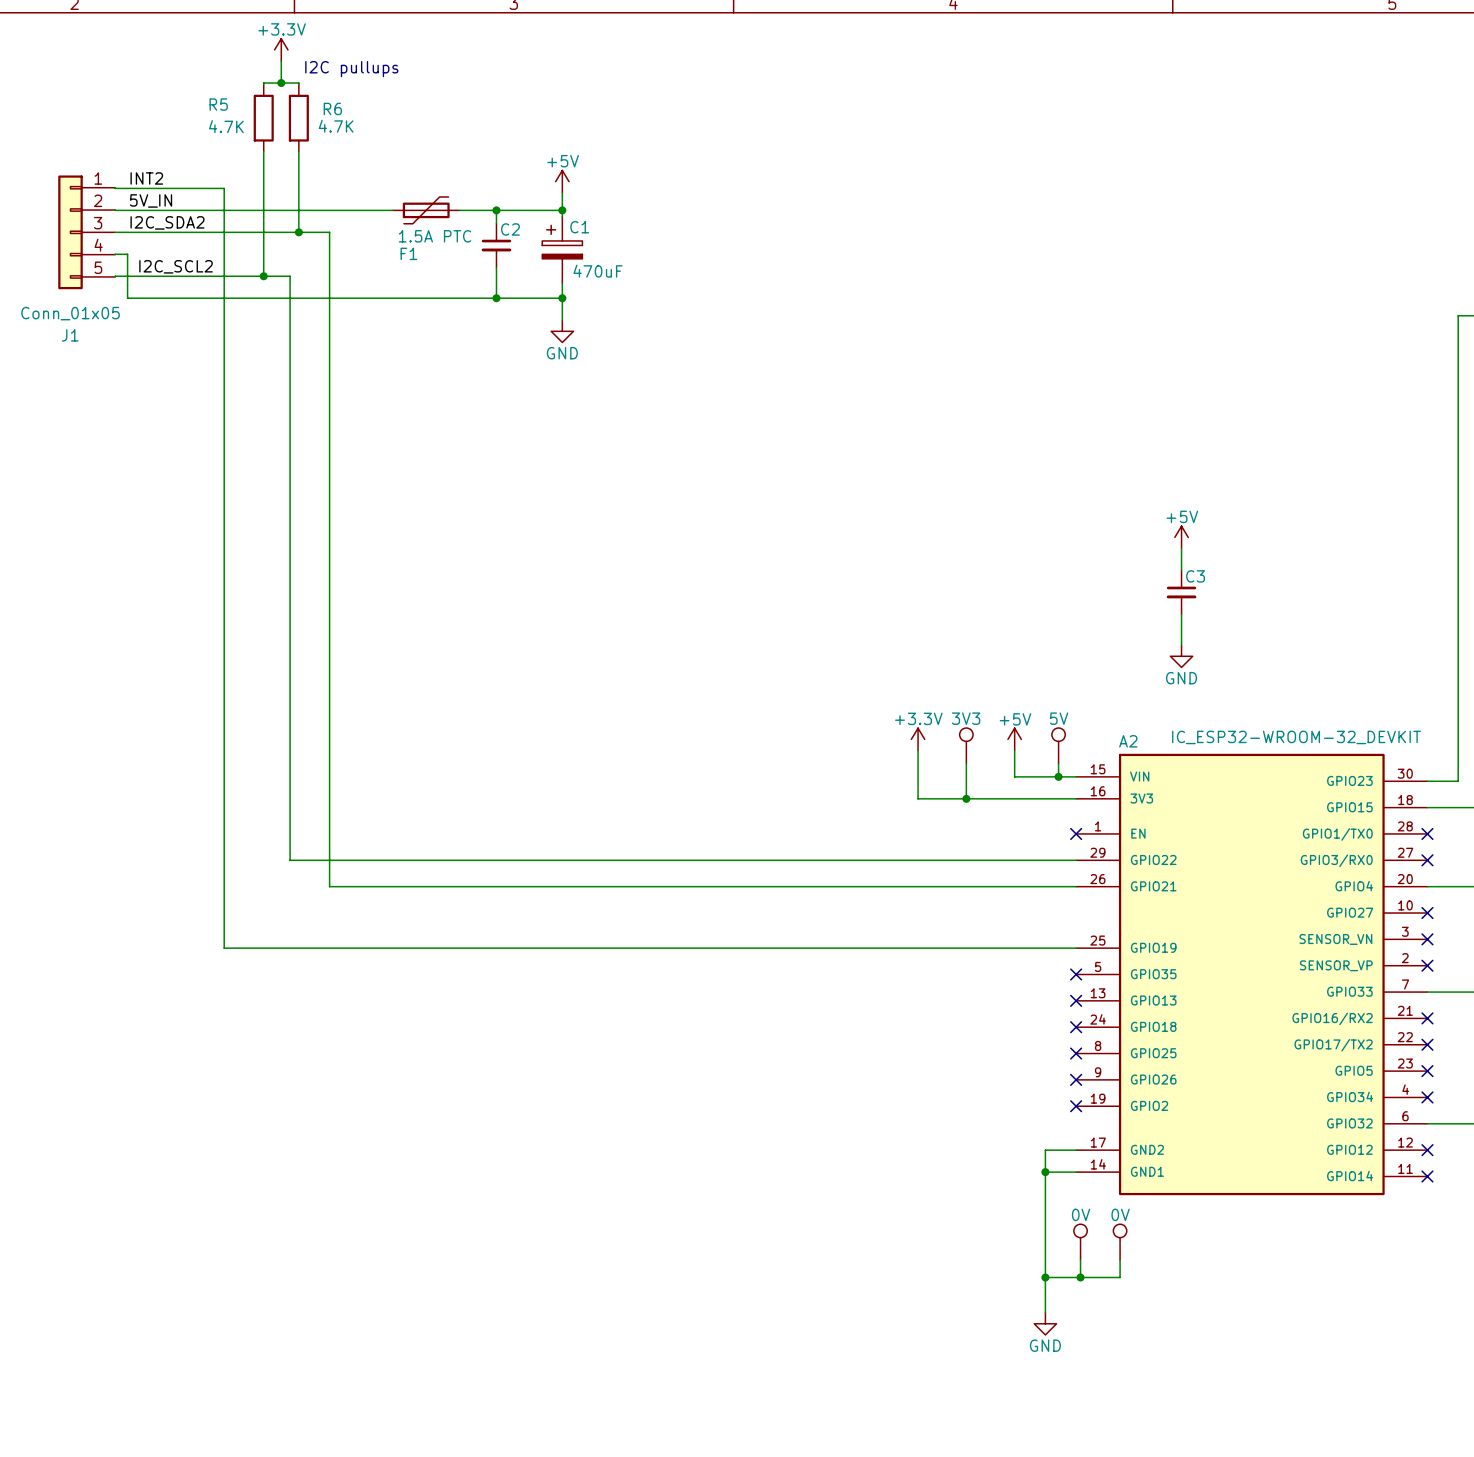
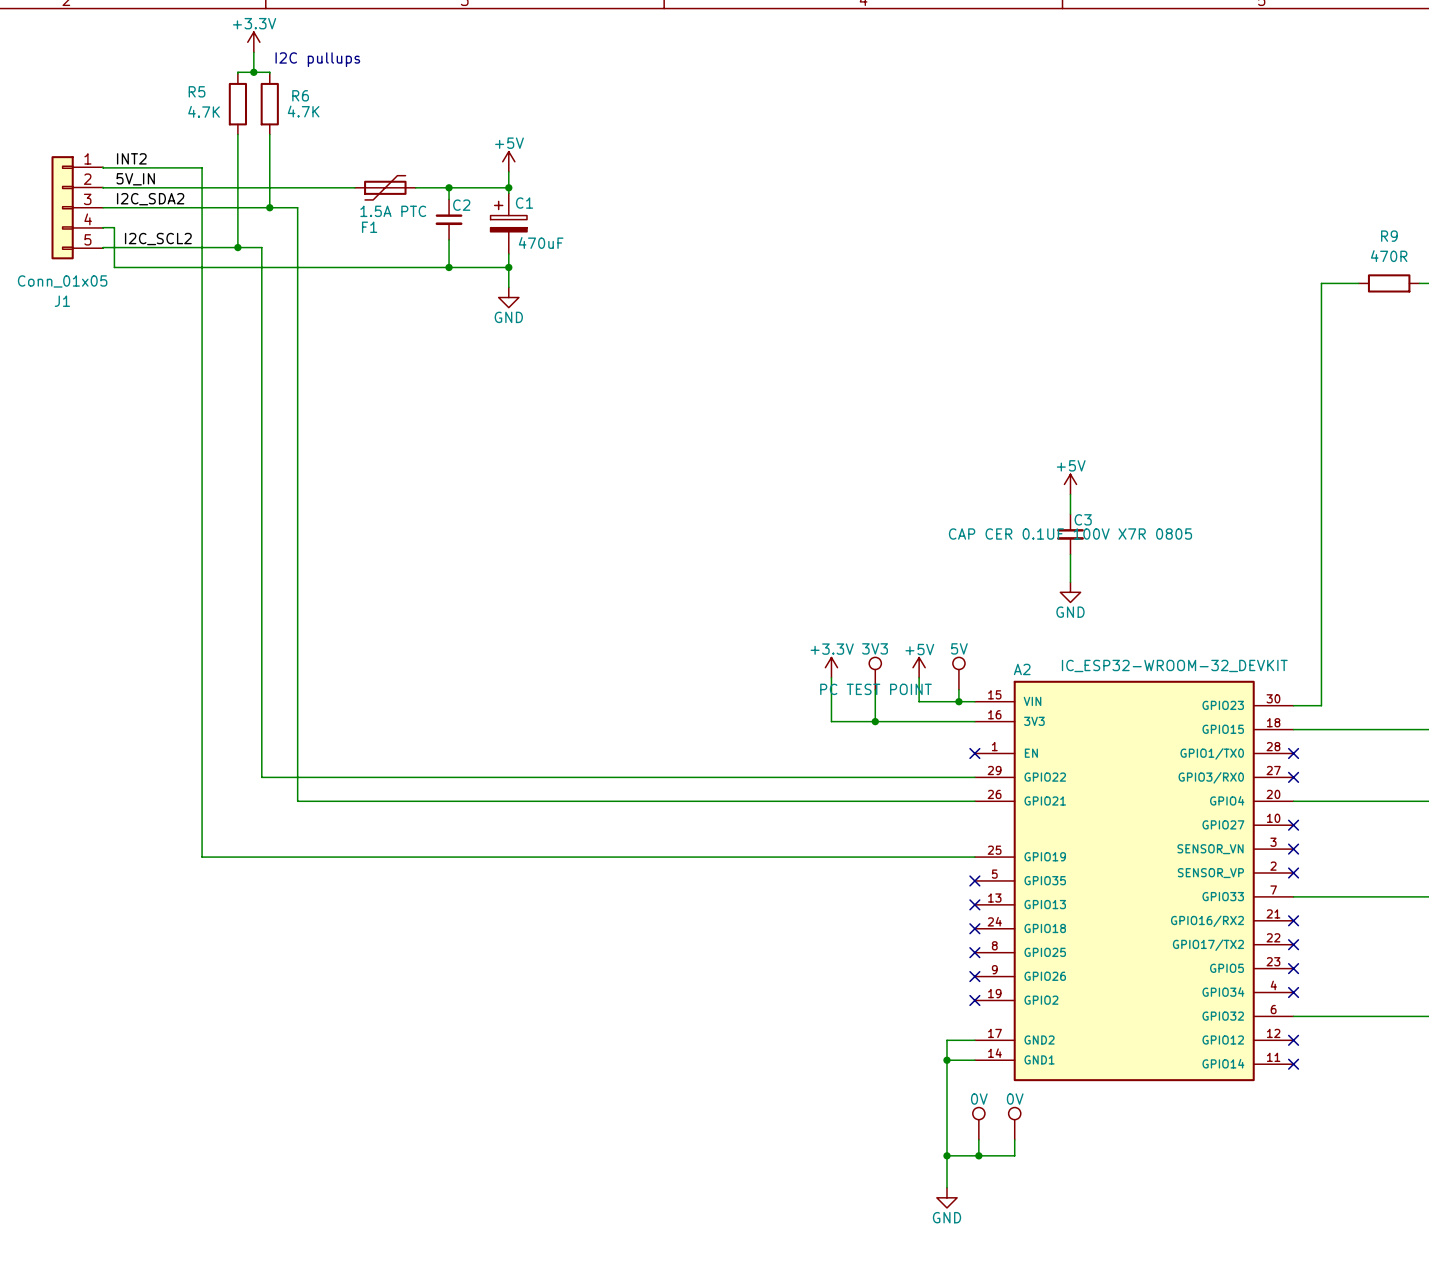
C3 text: none -> CAP CER 0.1UF 100V X7R 0805 (1070, 534)
part text: none -> PC TEST POINT (876, 689)

